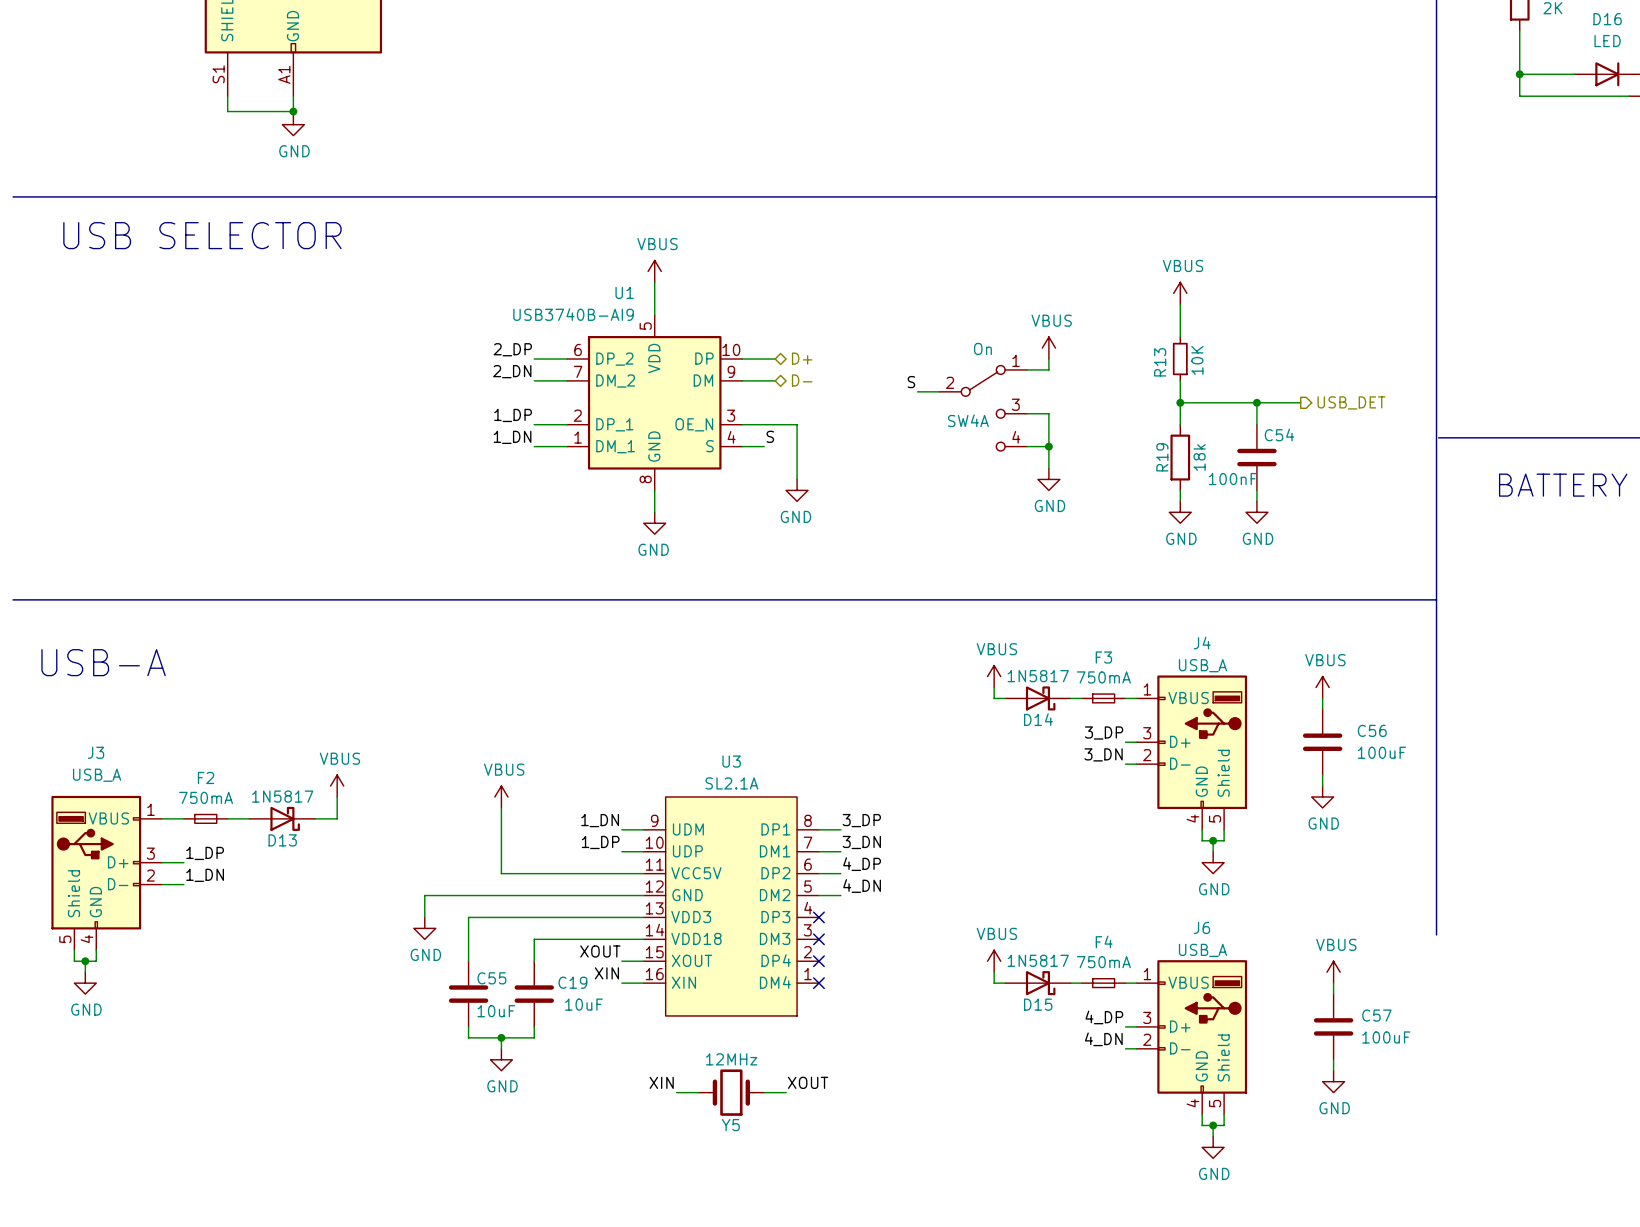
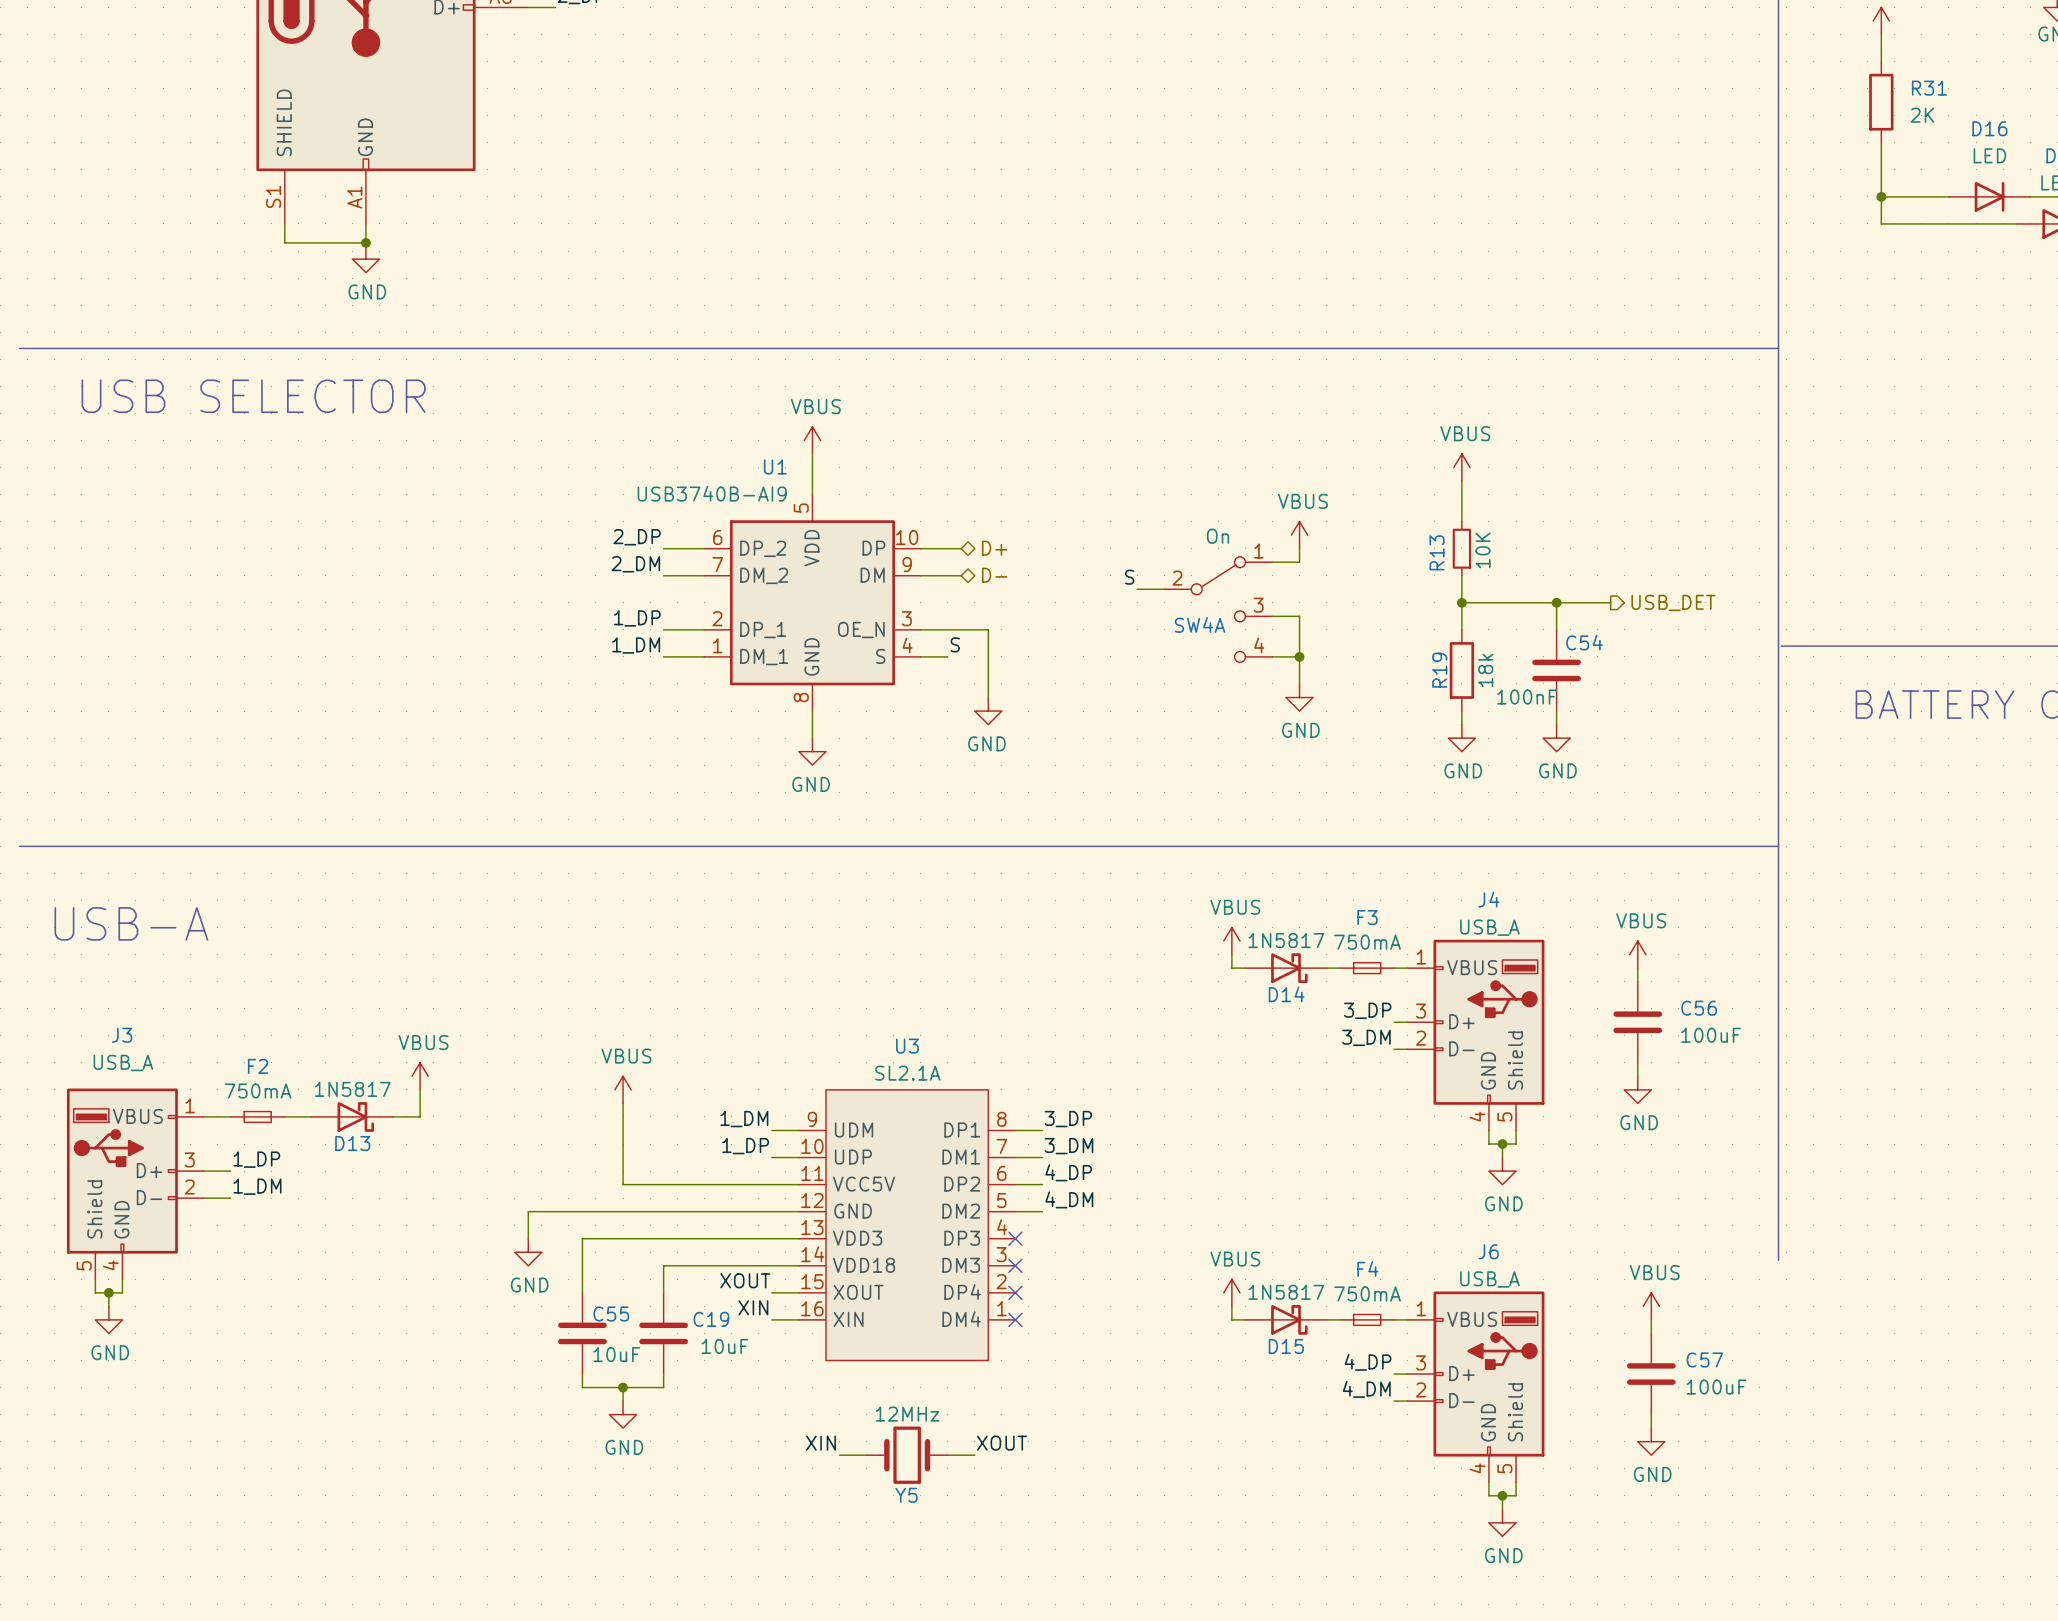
label: 2_DN (512, 371) -> 2_DM (635, 564)
label: 1_DN (512, 437) -> 1_DM (636, 645)
label: 3_DN (1103, 754) -> 3_DM (1366, 1037)
label: 1_DN (600, 820) -> 1_DM (744, 1119)
label: 3_DN (861, 842) -> 3_DM (1068, 1146)
label: 1_DN (205, 875) -> 1_DM (257, 1186)
label: 4_DN (862, 886) -> 4_DM (1069, 1199)
label: 4_DN (1103, 1039) -> 4_DM (1366, 1389)

